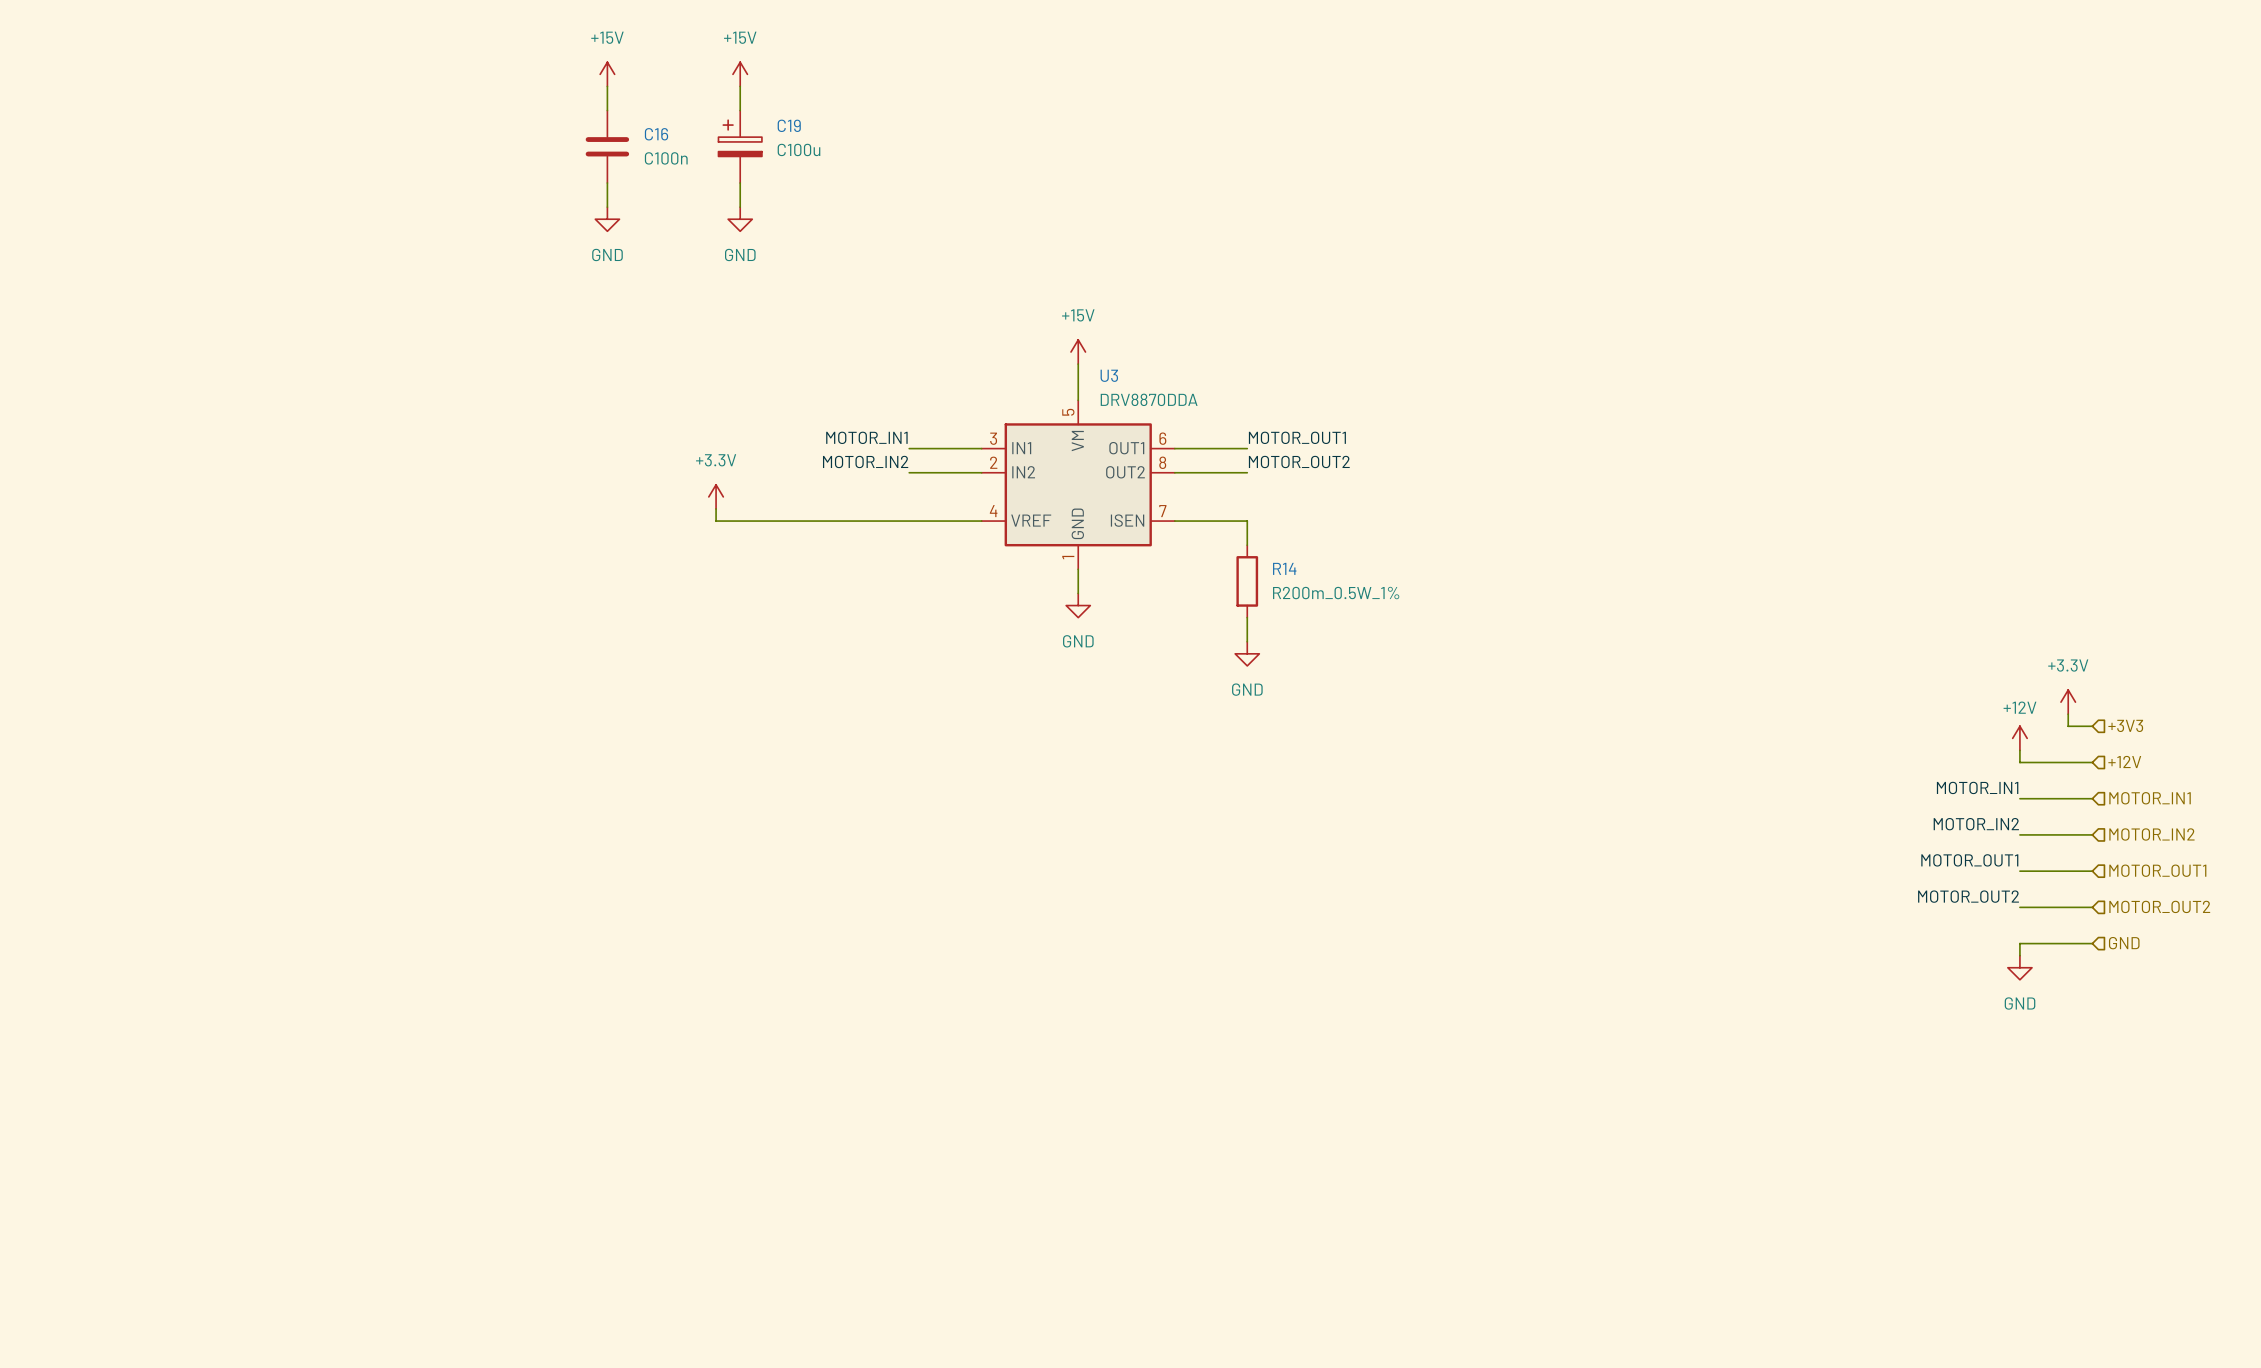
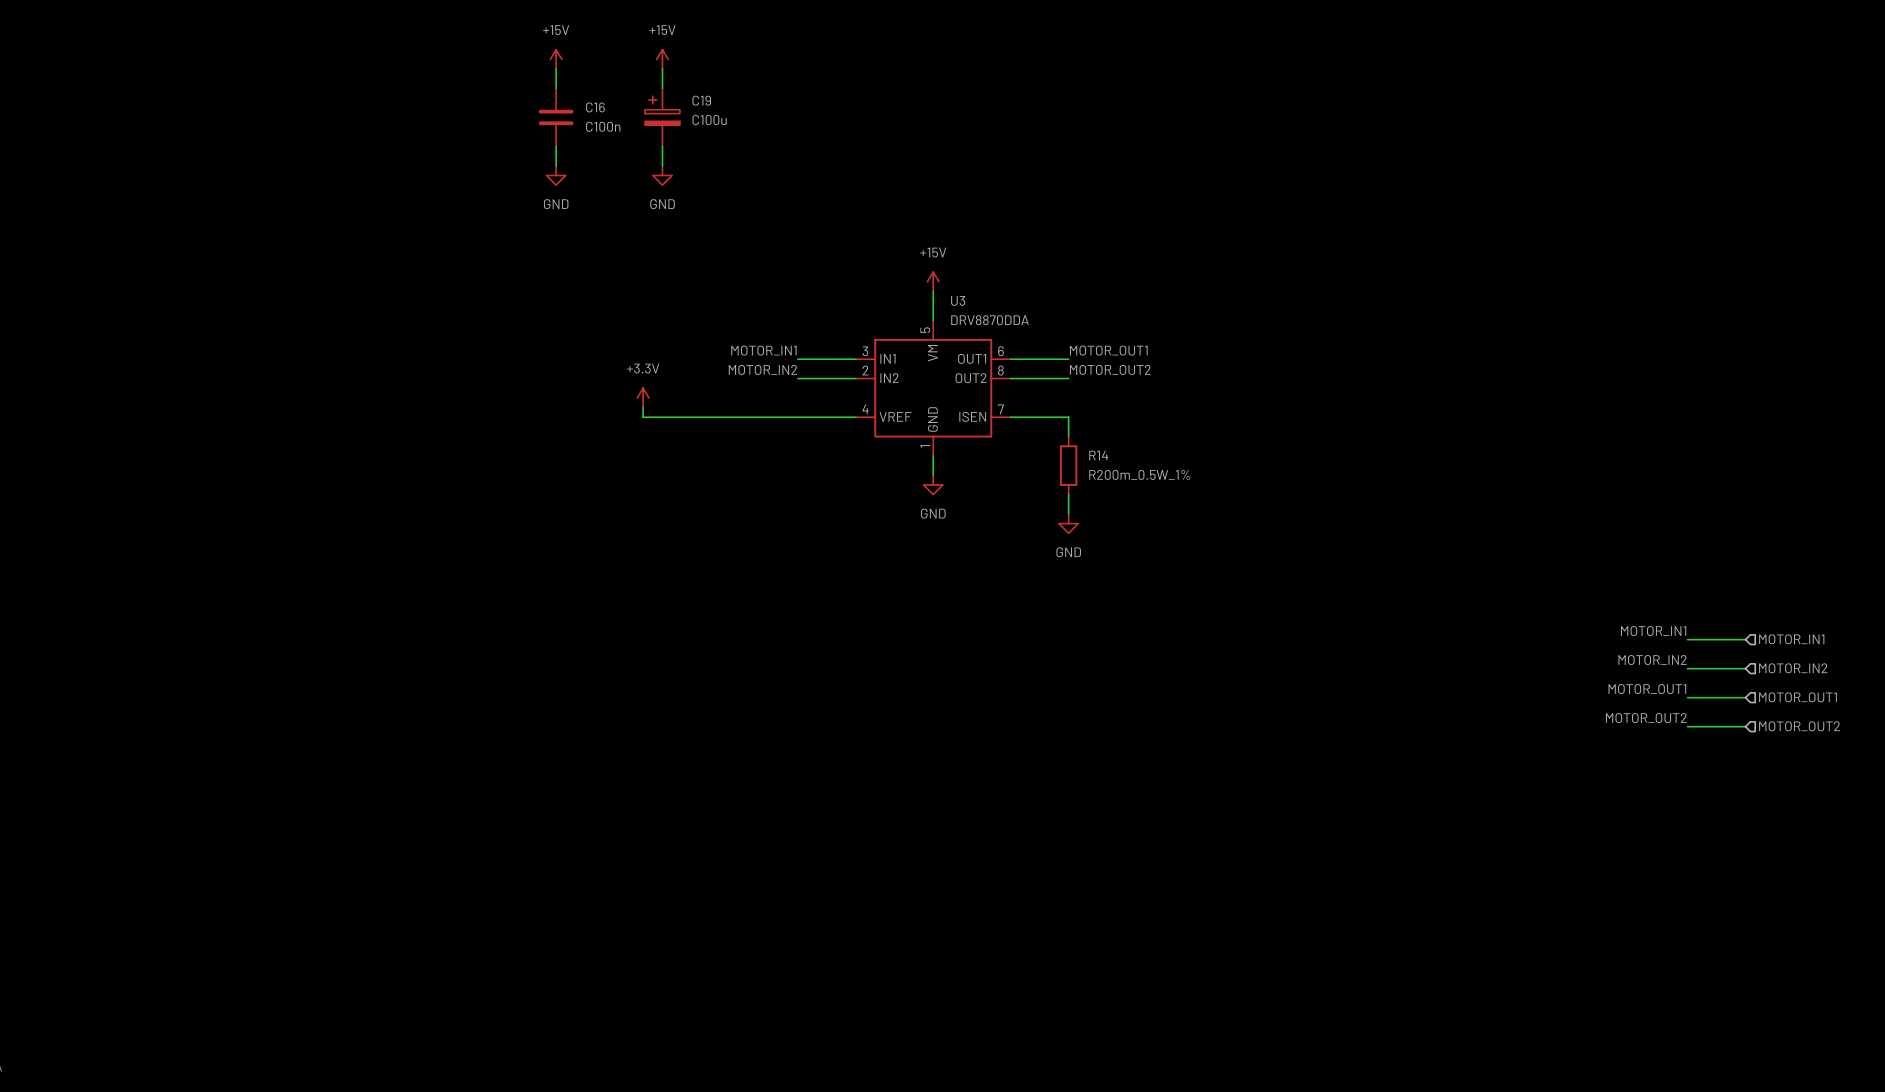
power symbol: +3.3V (2068, 702) -> none
wire: (2068, 714) (2068, 726) (2092, 726) -> none
hierarchical label: +3V3 (2125, 725) -> none
power symbol: +12V (2019, 738) -> none
wire: (2019, 750) (2019, 762) (2092, 762) -> none
hierarchical label: +12V (2124, 761) -> none
wire: (2092, 943) (2019, 943) (2019, 955) -> none
hierarchical label: GND (2124, 943) -> none
power symbol: GND (2019, 967) -> none

